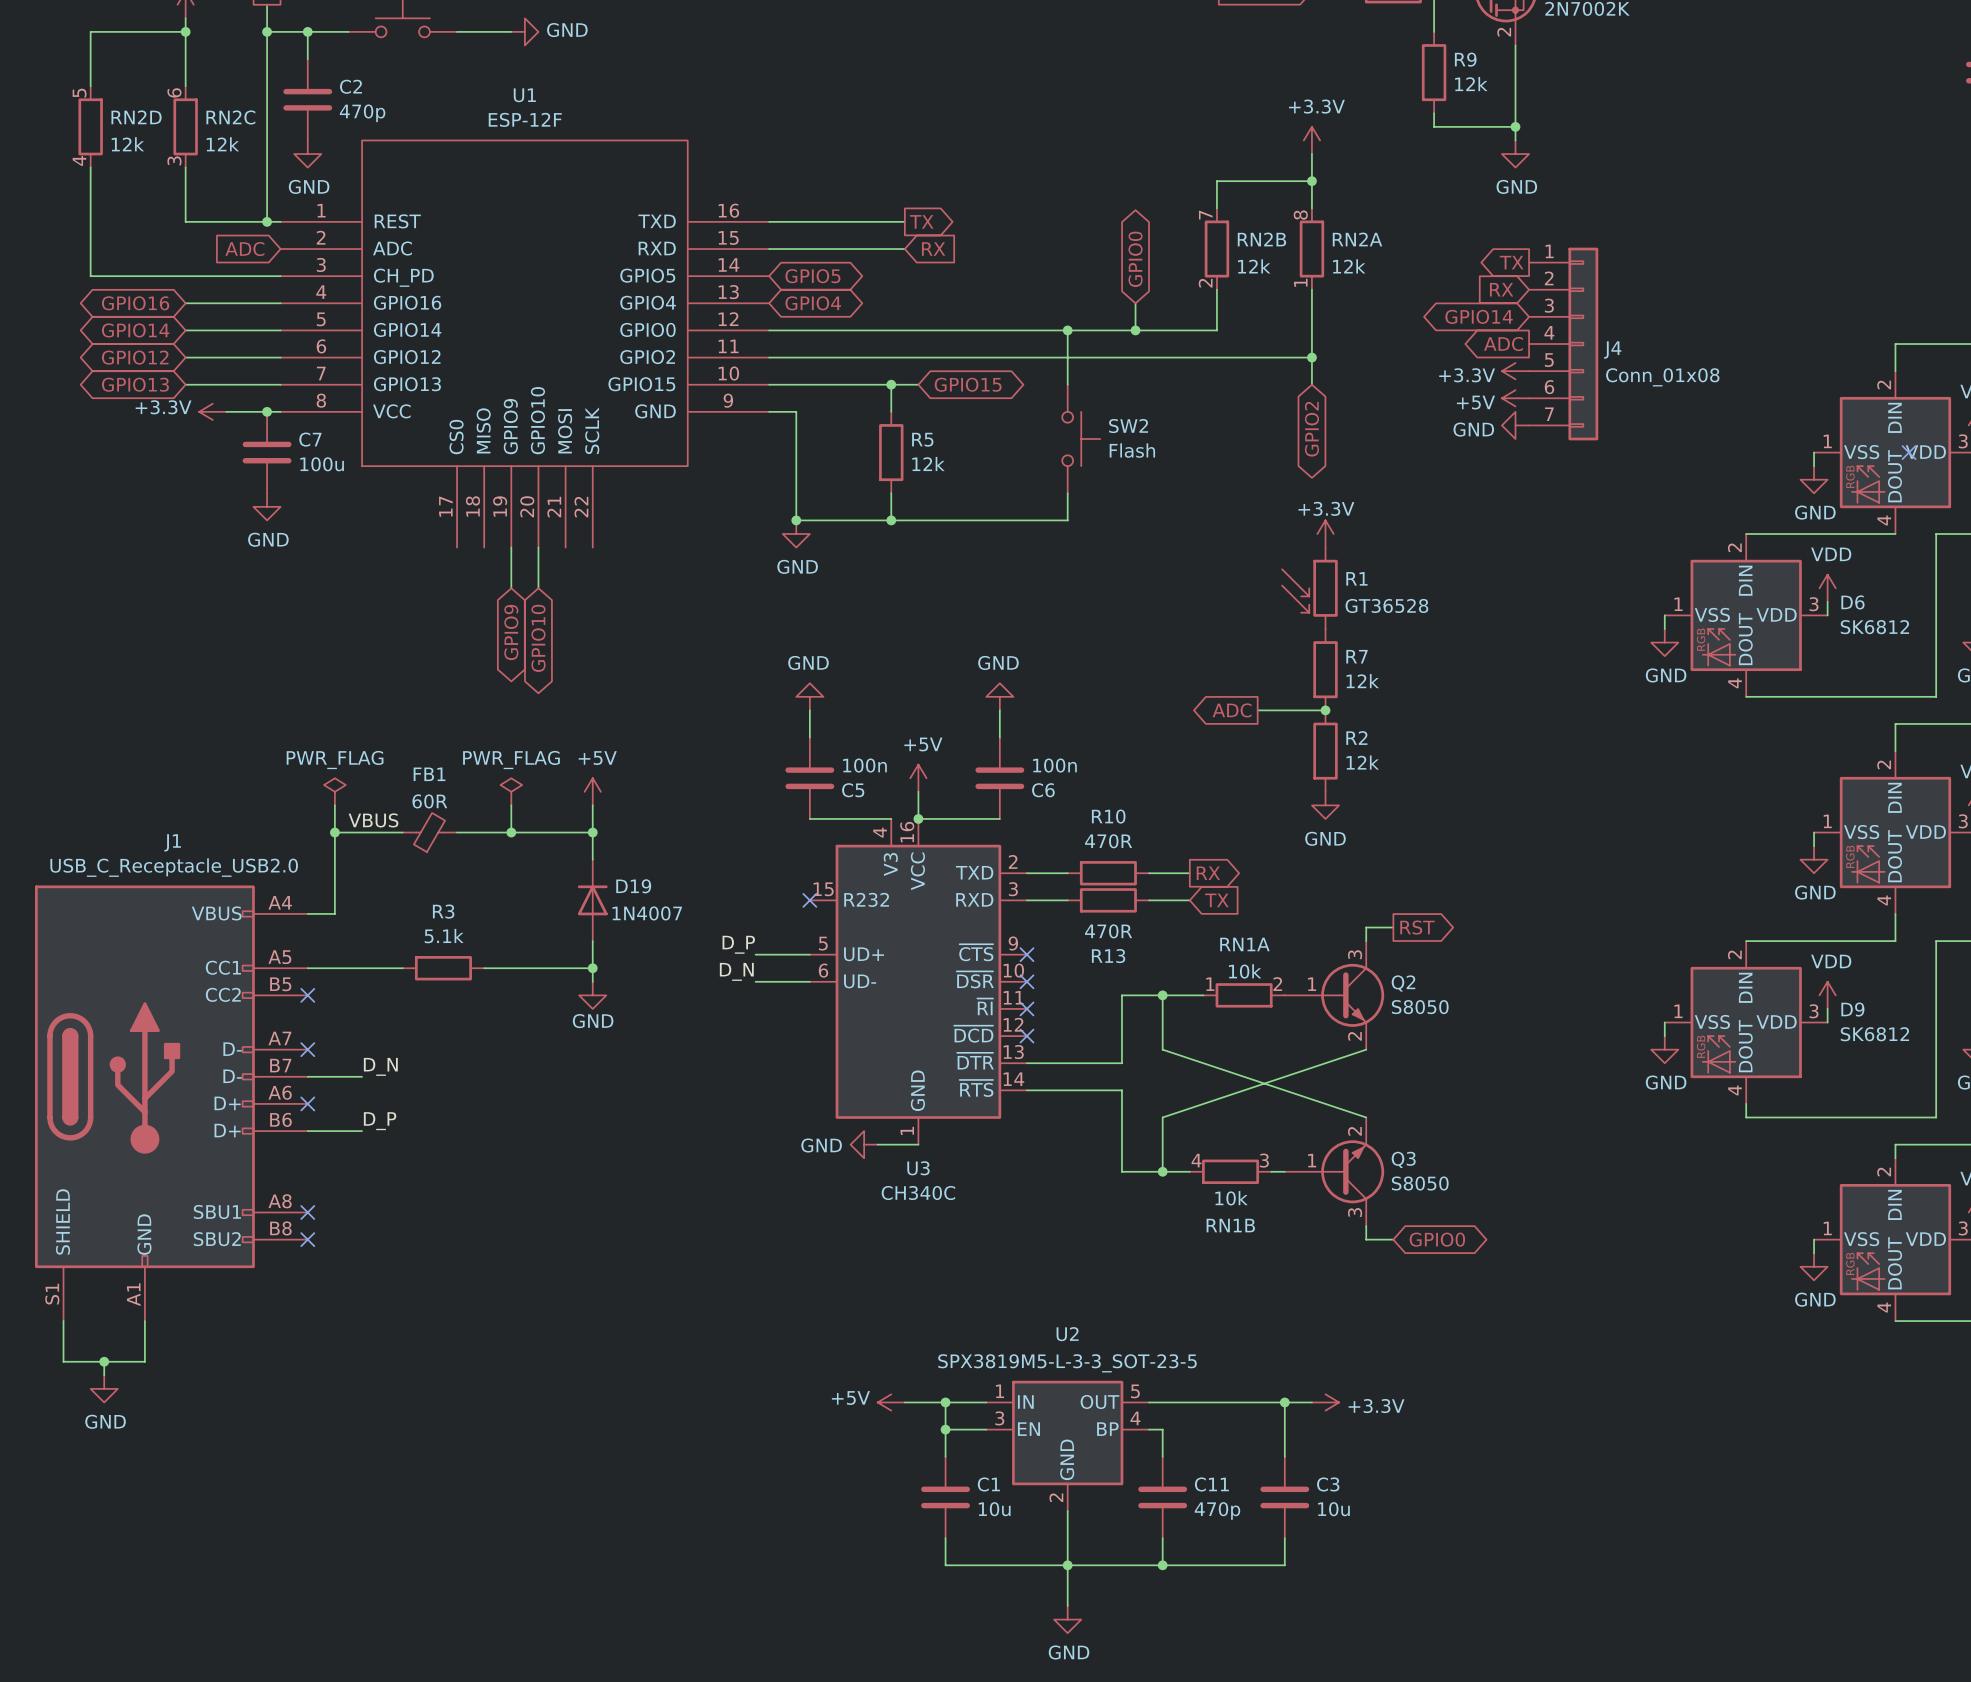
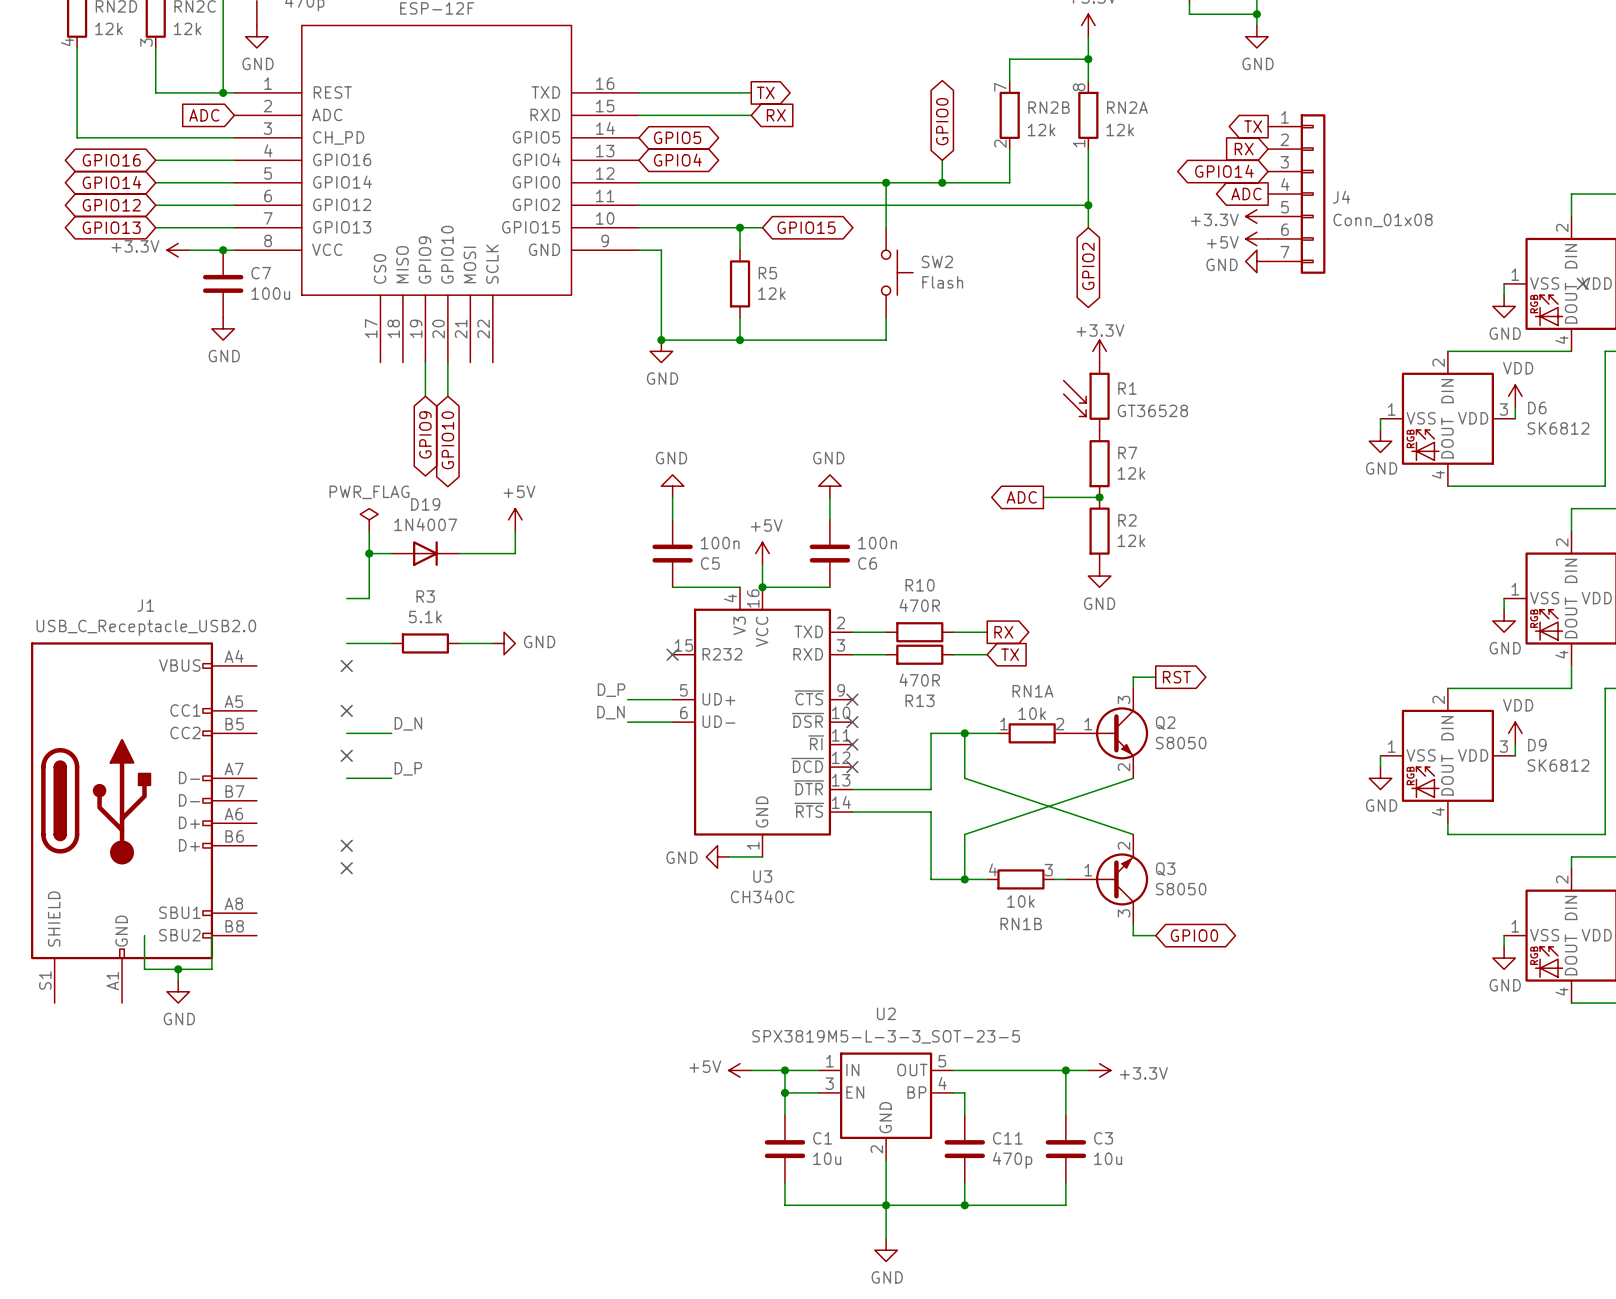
power symbol: none -> PWR_FLAG (369, 519)
wire: none -> (369, 531) (369, 598) (346, 598)
wire: none -> (515, 531) (515, 553) (459, 553)
wire: none -> (369, 553) (391, 553)
junction: none -> (369, 553)
power symbol: PWR_FLAG (334, 791) -> none
power symbol: PWR_FLAG (511, 791) -> none
power symbol position: +5V (592, 791) -> +5V (515, 519)
wire: (334, 805) (334, 913) (307, 913) -> none
wire: (511, 805) (511, 832) -> none
wire: (592, 805) (592, 859) -> none
label: VBUS (373, 820) -> none
wire: (334, 832) (402, 832) -> none
junction: (334, 832) -> none
FB1: 60R (429, 832) -> none
wire: (457, 832) (592, 832) -> none
junction: (511, 832) -> none
junction: (592, 832) -> none
wire: none -> (346, 643) (391, 643)
wire: none -> (459, 643) (492, 643)
D19 name position: D19 (633, 886) -> D19 (425, 504)
D19 rotation: 0° (592, 900) -> 90° clockwise (425, 553)
D19 position: (592, 900) -> (425, 553)
no-connect mark: none -> (346, 665)
D19 value position: 1N4007 (647, 913) -> 1N4007 (425, 524)
wire: (592, 941) (592, 981) -> none
wire: (307, 968) (402, 968) -> none
no-connect mark: none -> (346, 710)
R3 position: (443, 968) -> (425, 643)
wire: (484, 968) (592, 968) -> none
junction: (592, 968) -> none
no-connect mark: (307, 995) -> none
power symbol rotation: 0° (592, 995) -> 90° counterclockwise (504, 643)
power symbol position: GND (592, 995) -> GND (504, 643)
no-connect mark: none -> (346, 755)
no-connect mark: (307, 1049) -> none
label position: D_N (380, 1066) -> D_N (408, 723)
wire: (307, 1076) (362, 1076) -> (346, 733) (391, 733)
no-connect mark: (307, 1103) -> none
label position: D_P (380, 1121) -> D_P (408, 768)
wire: (307, 1131) (362, 1131) -> (346, 778) (391, 778)
no-connect mark: none -> (346, 845)
no-connect mark: none -> (346, 868)
no-connect mark: (307, 1212) -> none
no-connect mark: (307, 1239) -> none
junction: none -> (178, 969)
wire: (63, 1321) (63, 1361) (144, 1361) (144, 1321) -> (144, 935) (144, 969) (211, 969) (211, 935)
wire: (104, 1361) (104, 1375) -> (178, 969) (178, 980)
junction: (104, 1361) -> none
power symbol position: GND (104, 1388) -> GND (178, 991)

